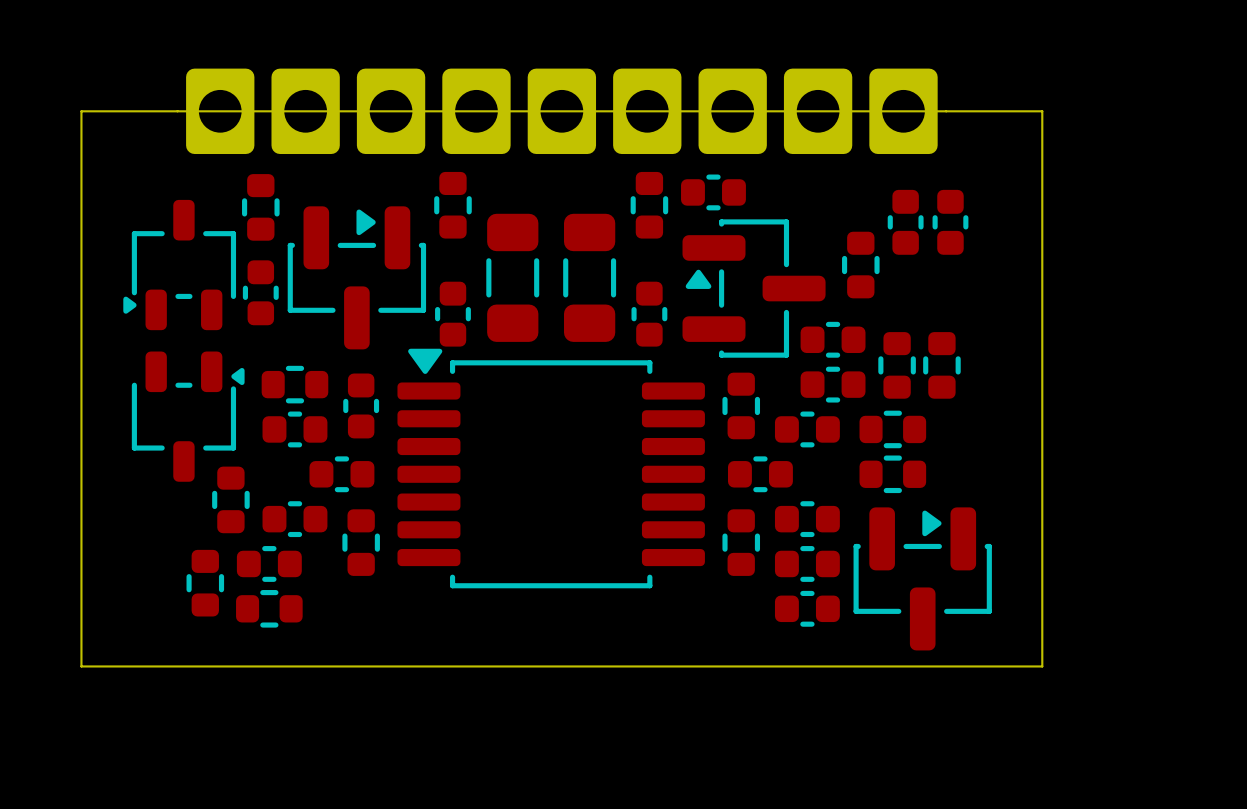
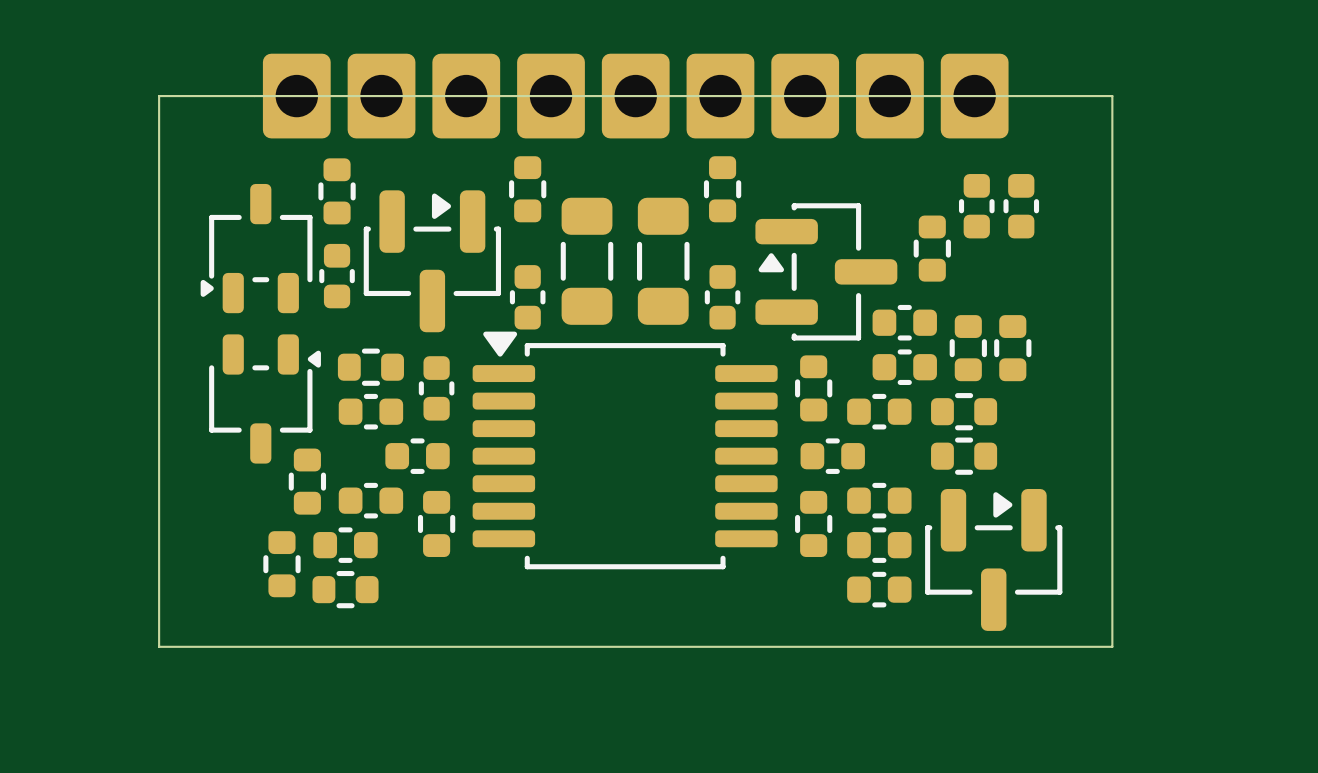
part: (713, 192) -> none

